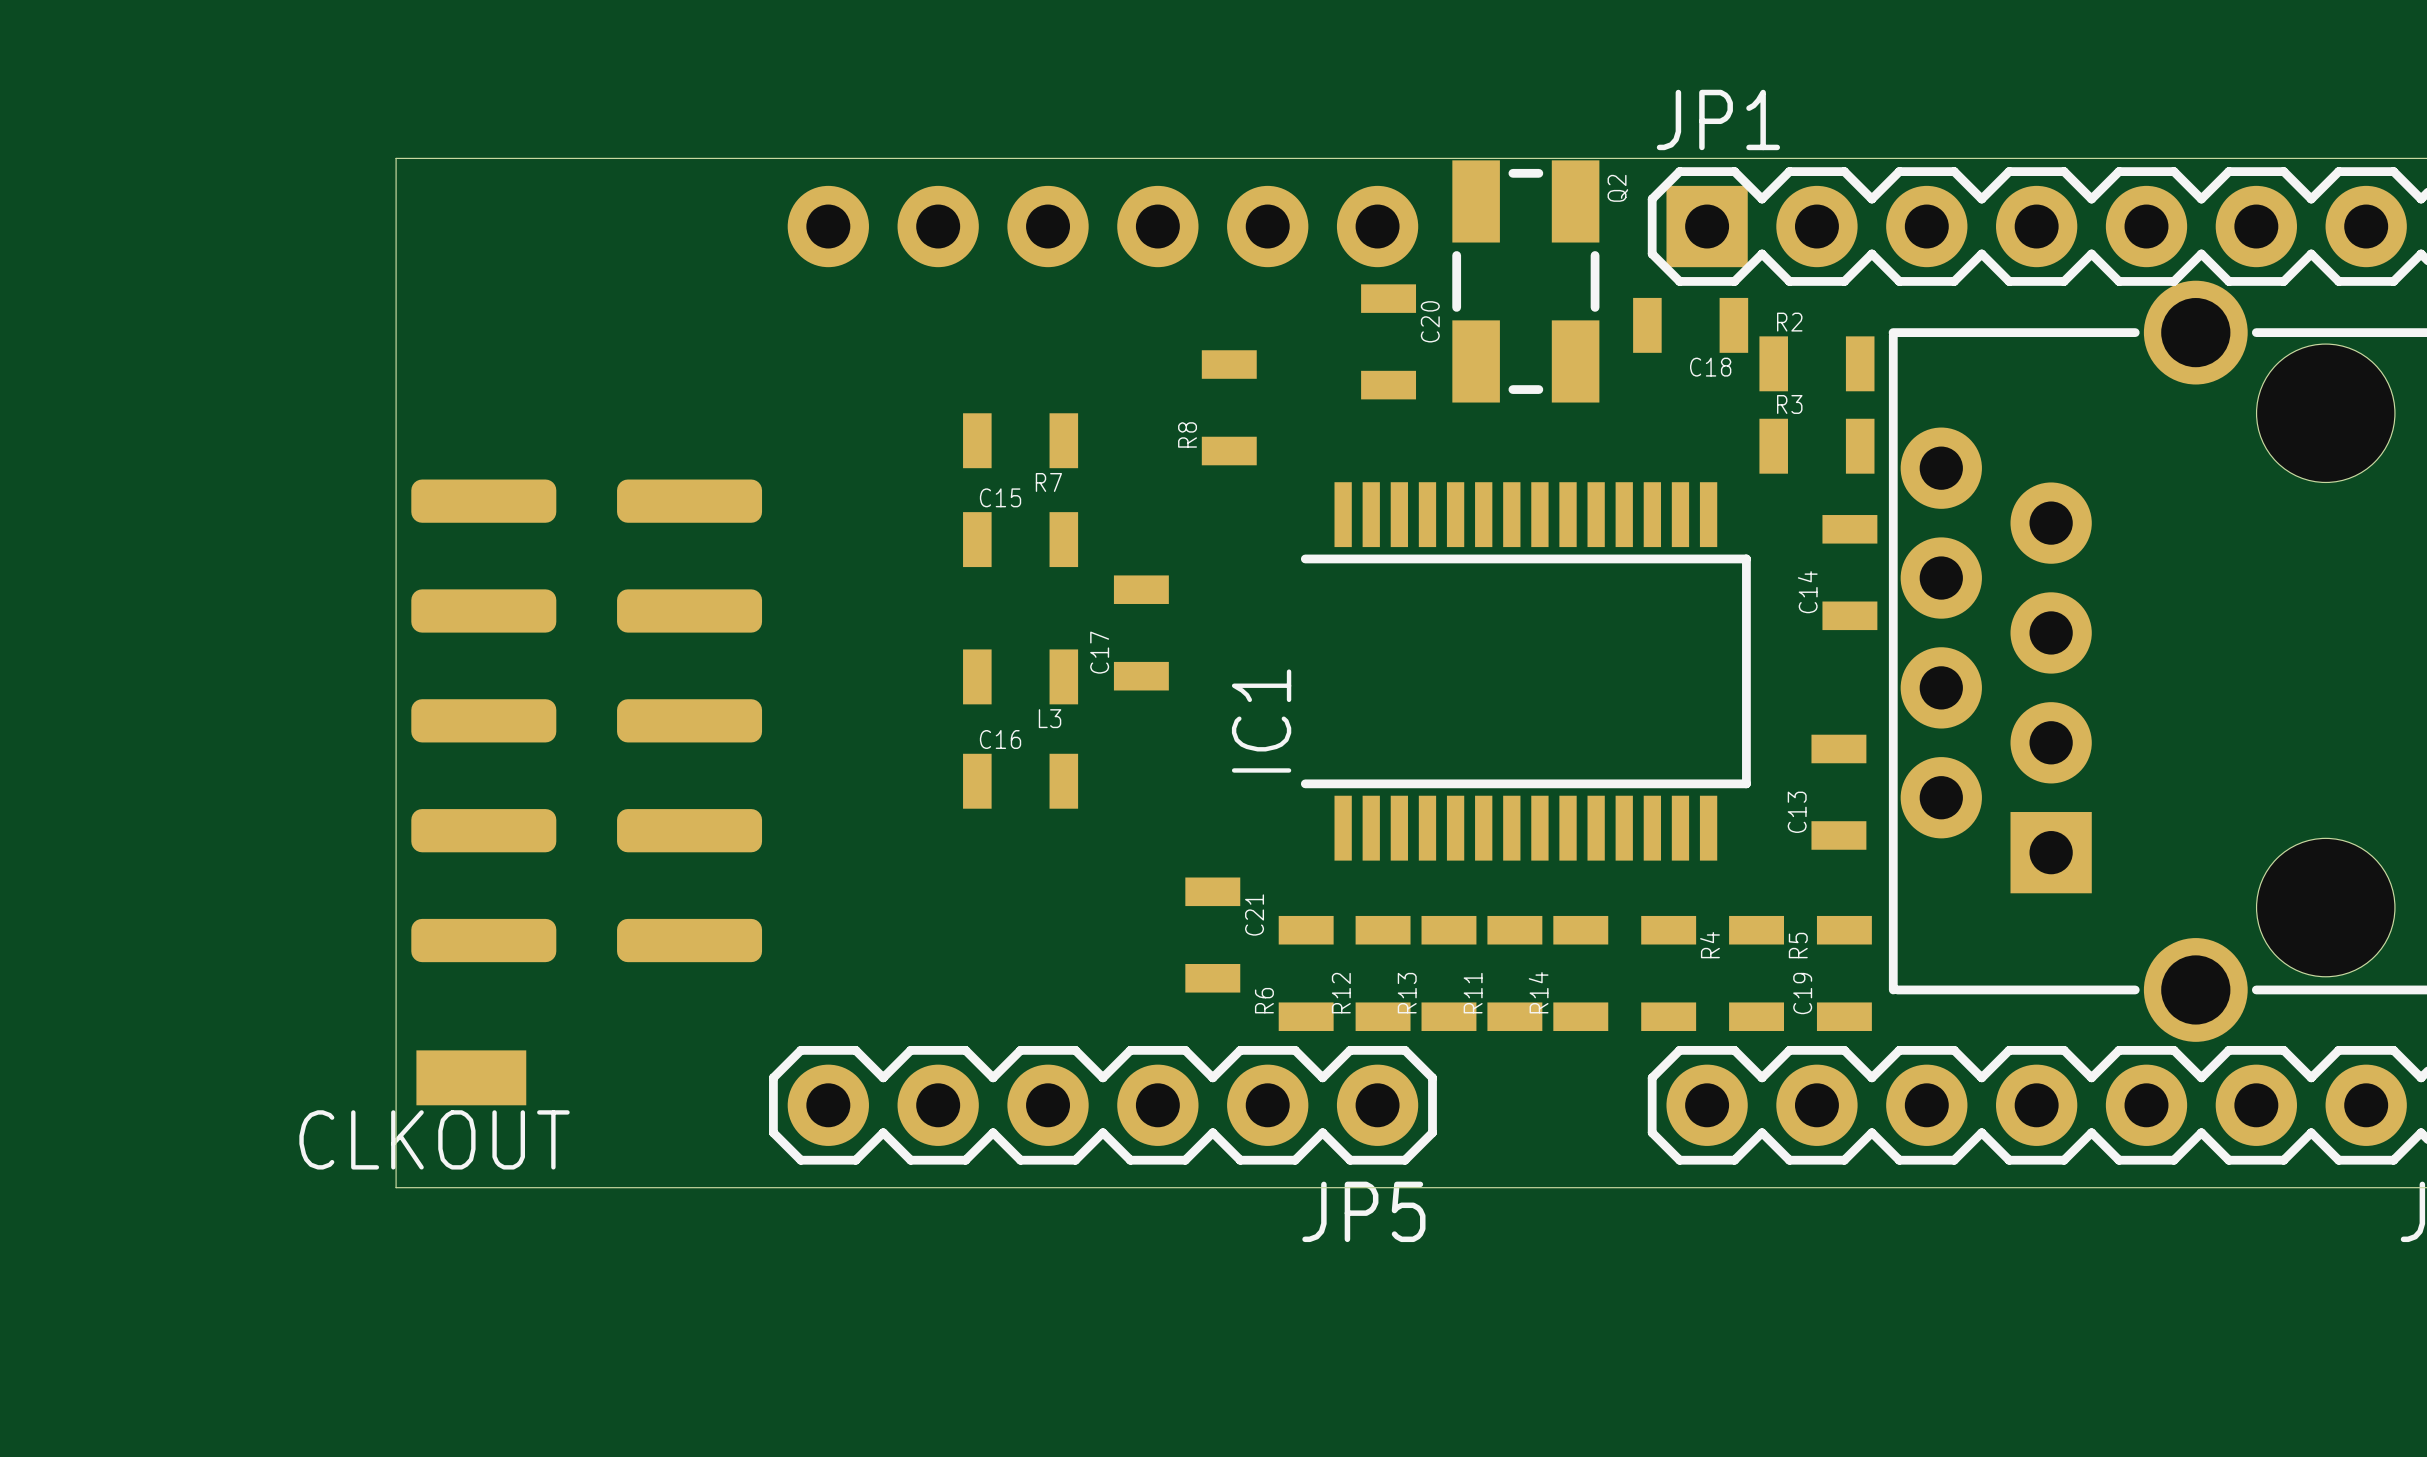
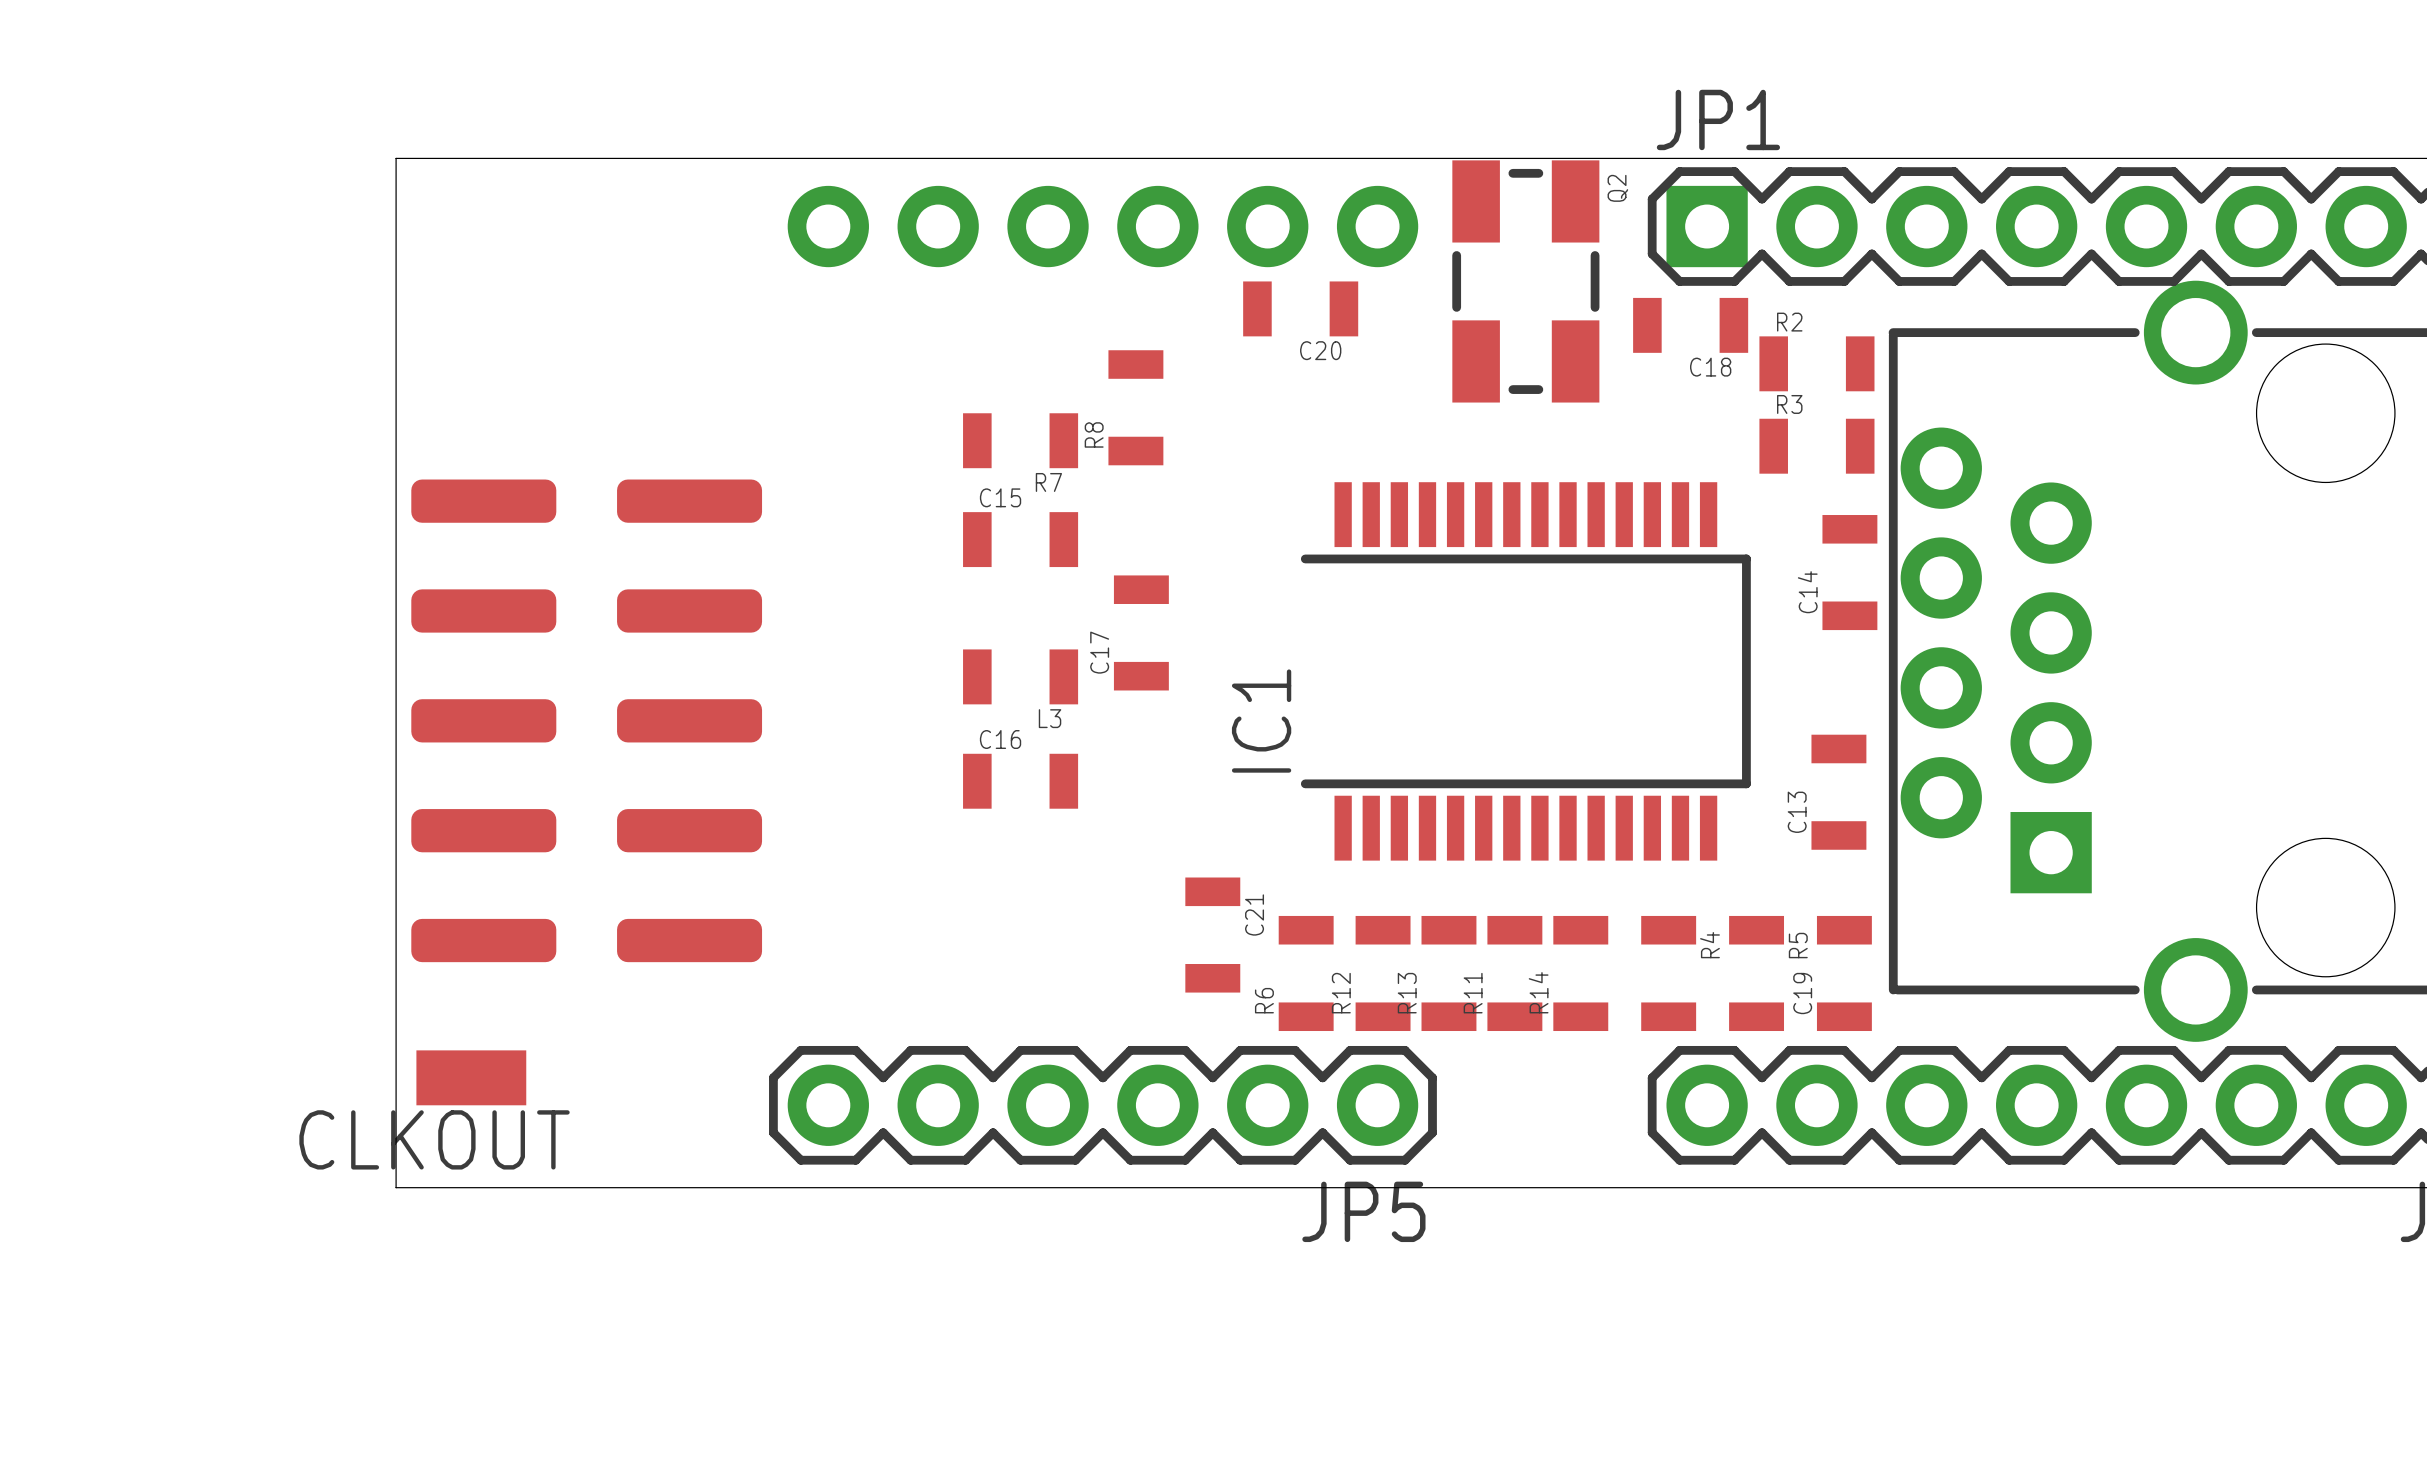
C20 rotation: 0° (1388, 341) -> 90° clockwise (1300, 308)
C20 position: (1388, 341) -> (1300, 308)
R8 position: (1229, 407) -> (1135, 407)

